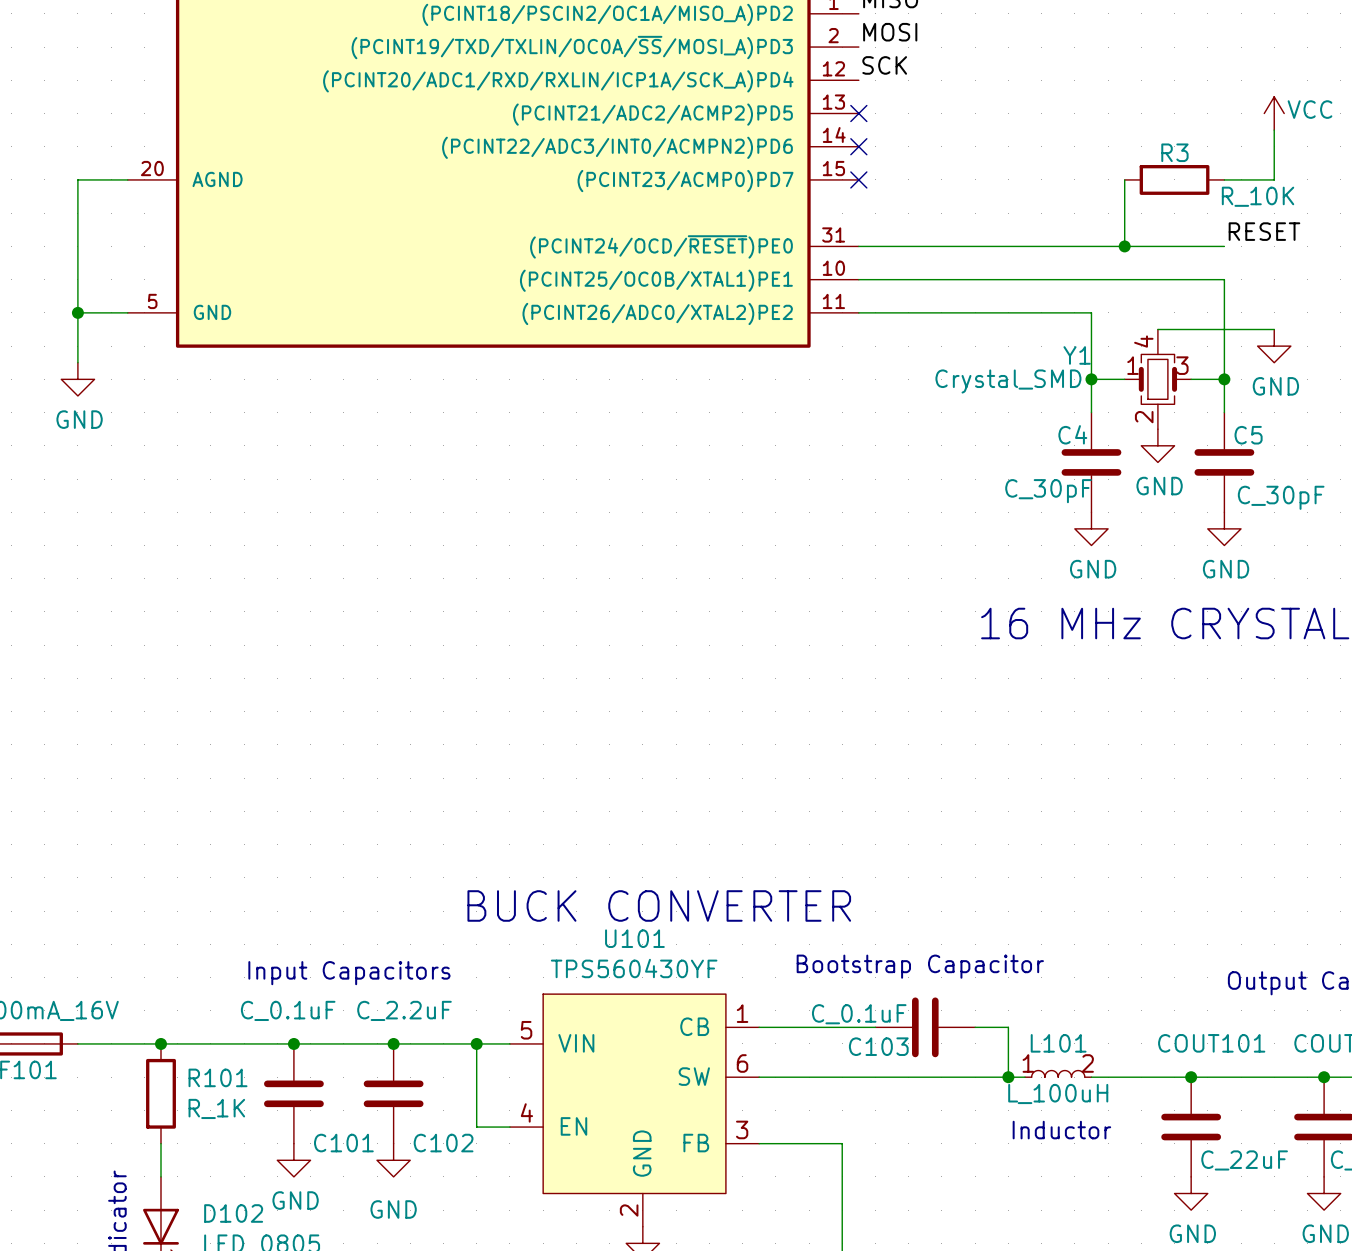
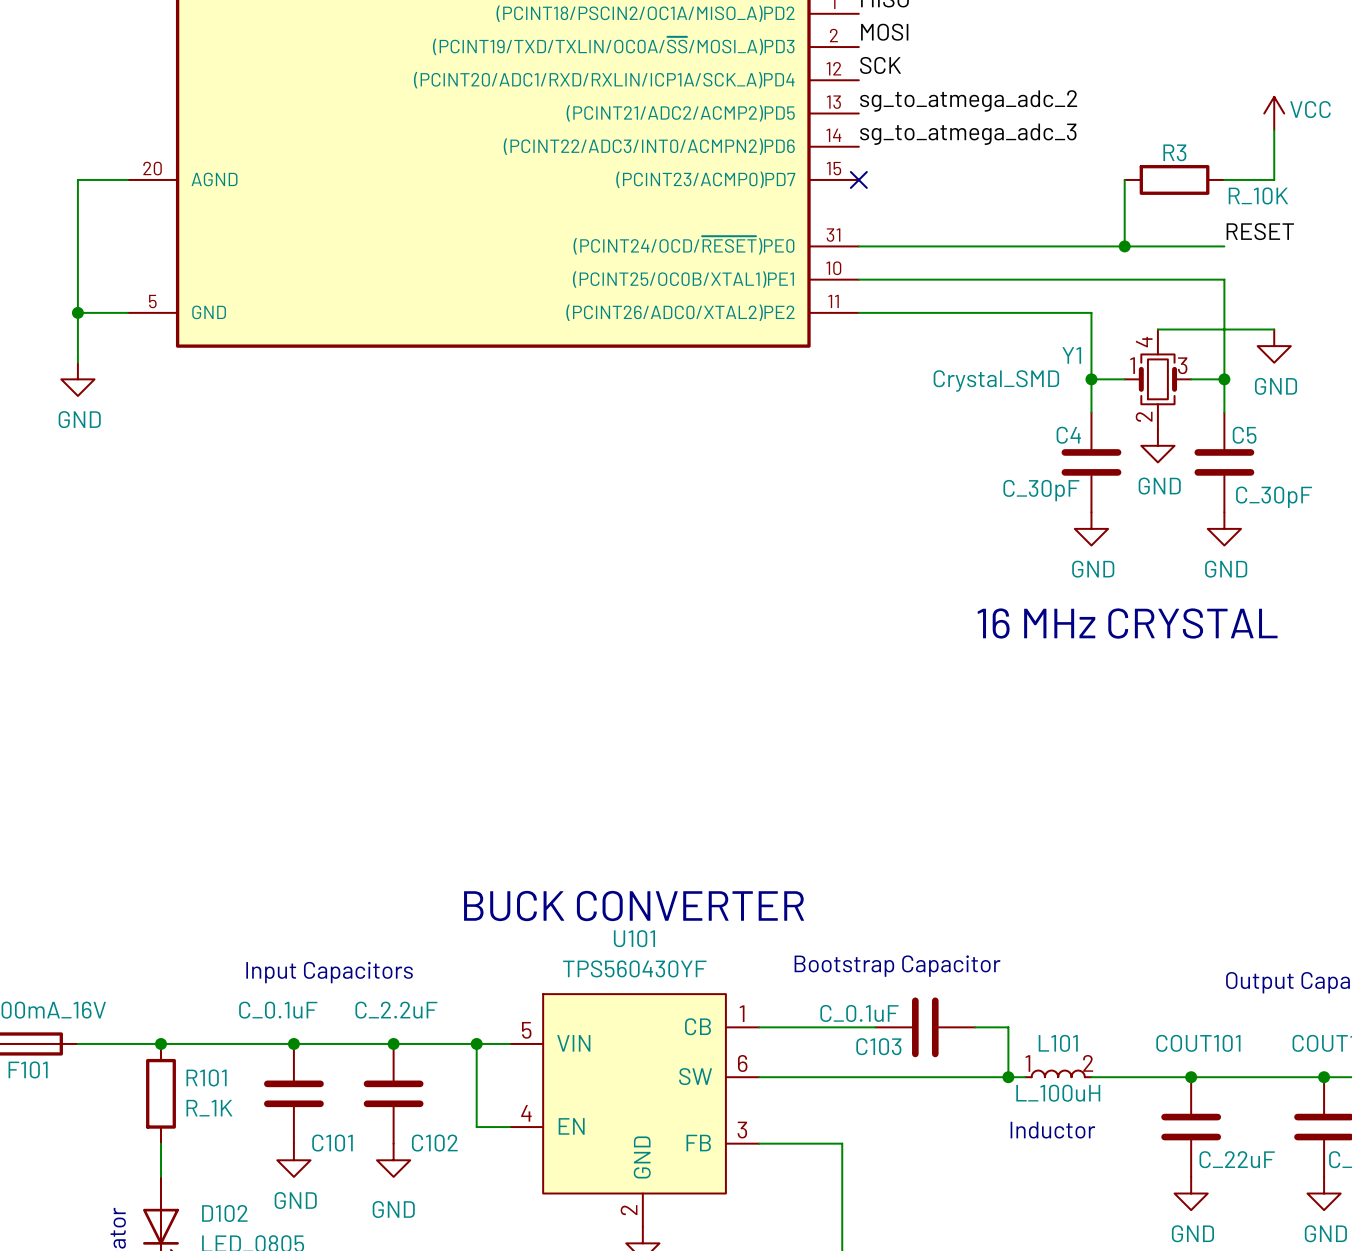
label: none -> sg_to_atmega_adc_2 (968, 100)
no-connect mark: (858, 113) -> none
label: none -> sg_to_atmega_adc_3 (968, 134)
no-connect mark: (858, 146) -> none

